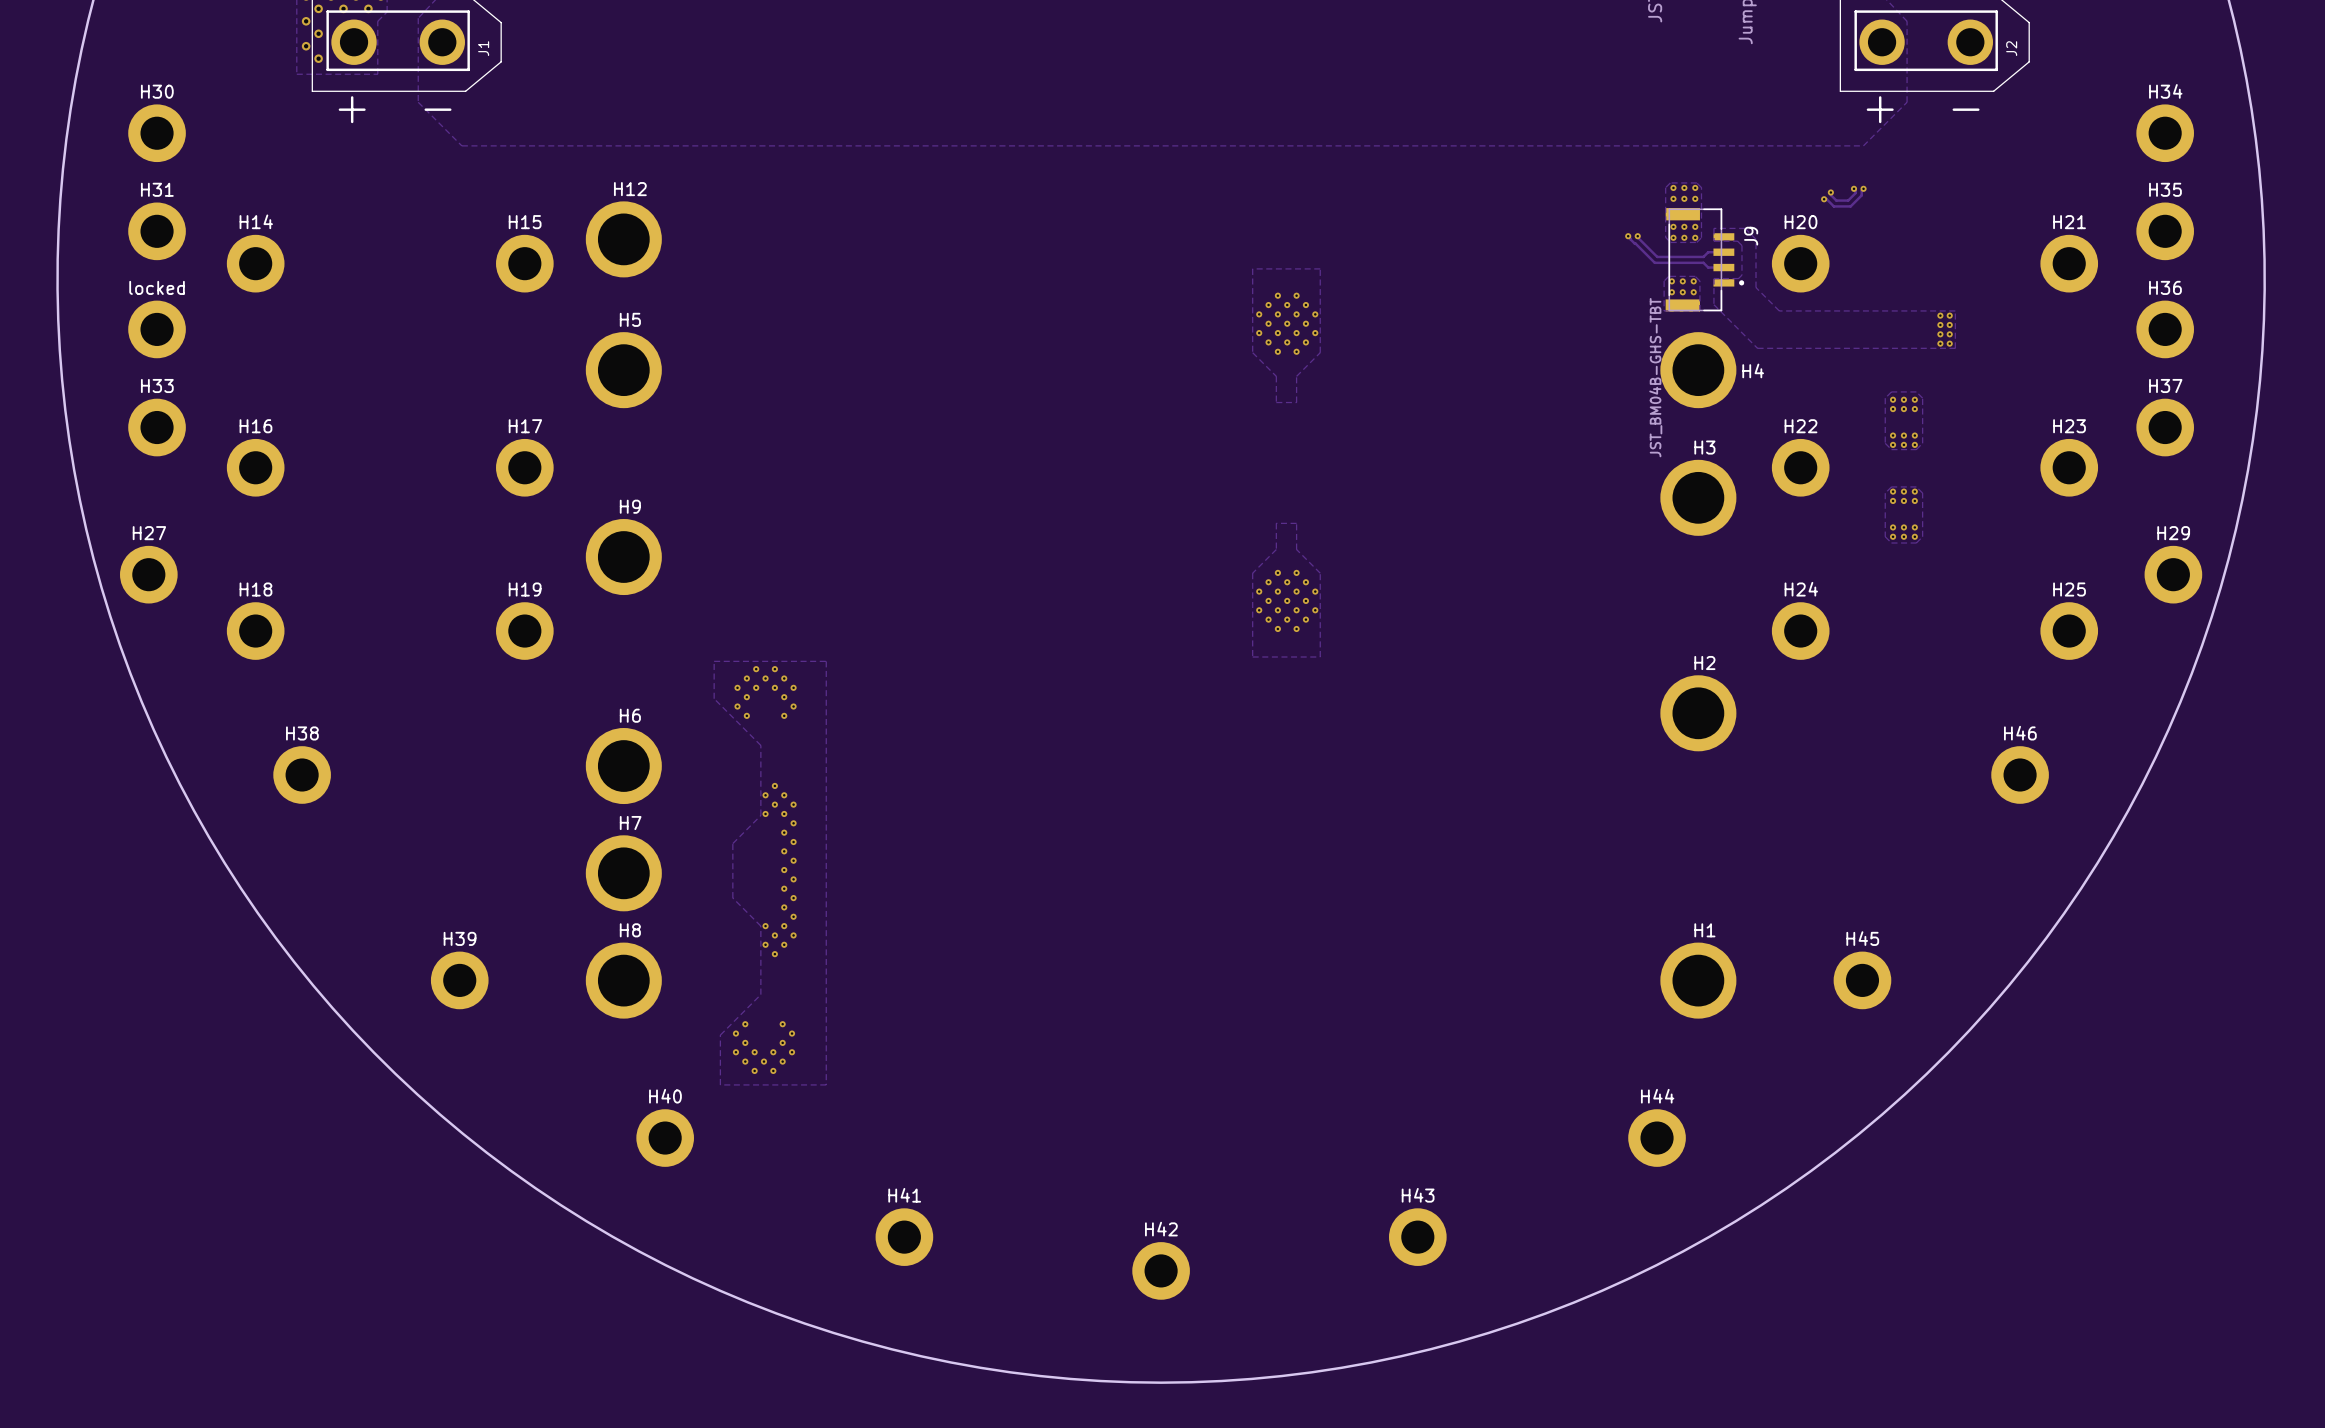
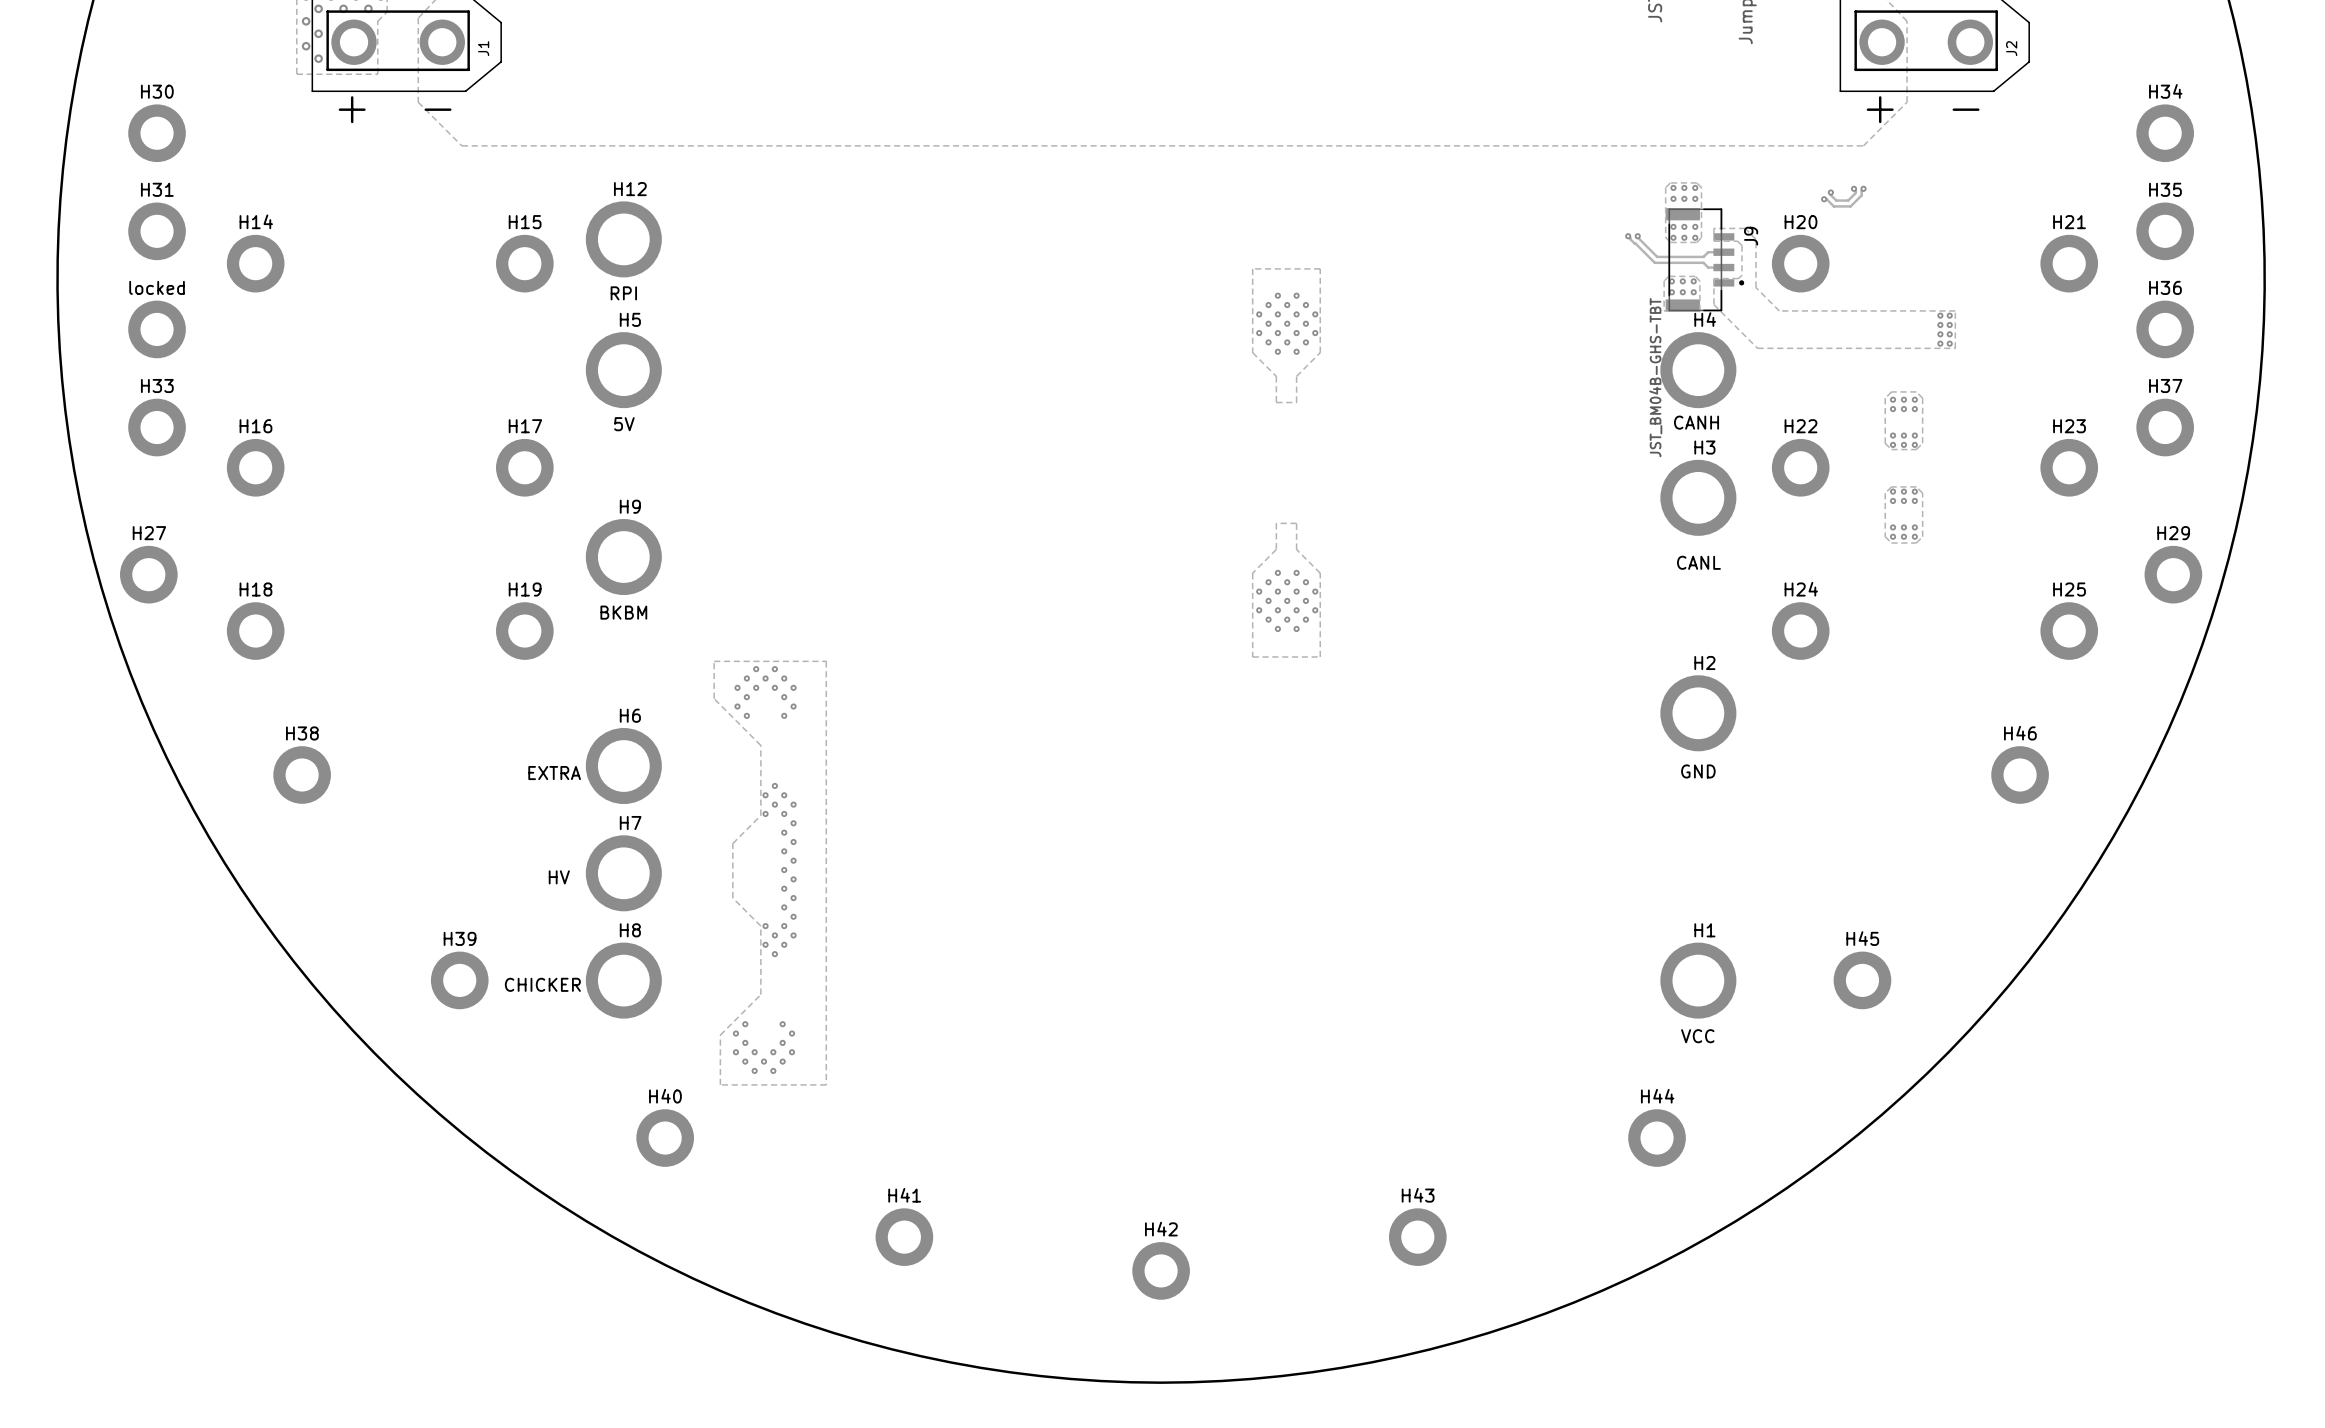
H12 value: none -> RPI (623, 293)
H4 name position: H4 (1753, 370) -> H4 (1705, 319)
H4 value: none -> CANH (1696, 422)
H5 value: none -> 5V (624, 424)
H3 value: none -> CANL (1698, 562)
H9 value: none -> BKBM (623, 612)
H2 value: none -> GND (1698, 771)
H6 value: none -> EXTRA (554, 773)
H7 value: none -> HV (559, 877)
H8 value: none -> CHICKER (542, 984)
H1 value: none -> VCC (1697, 1036)

